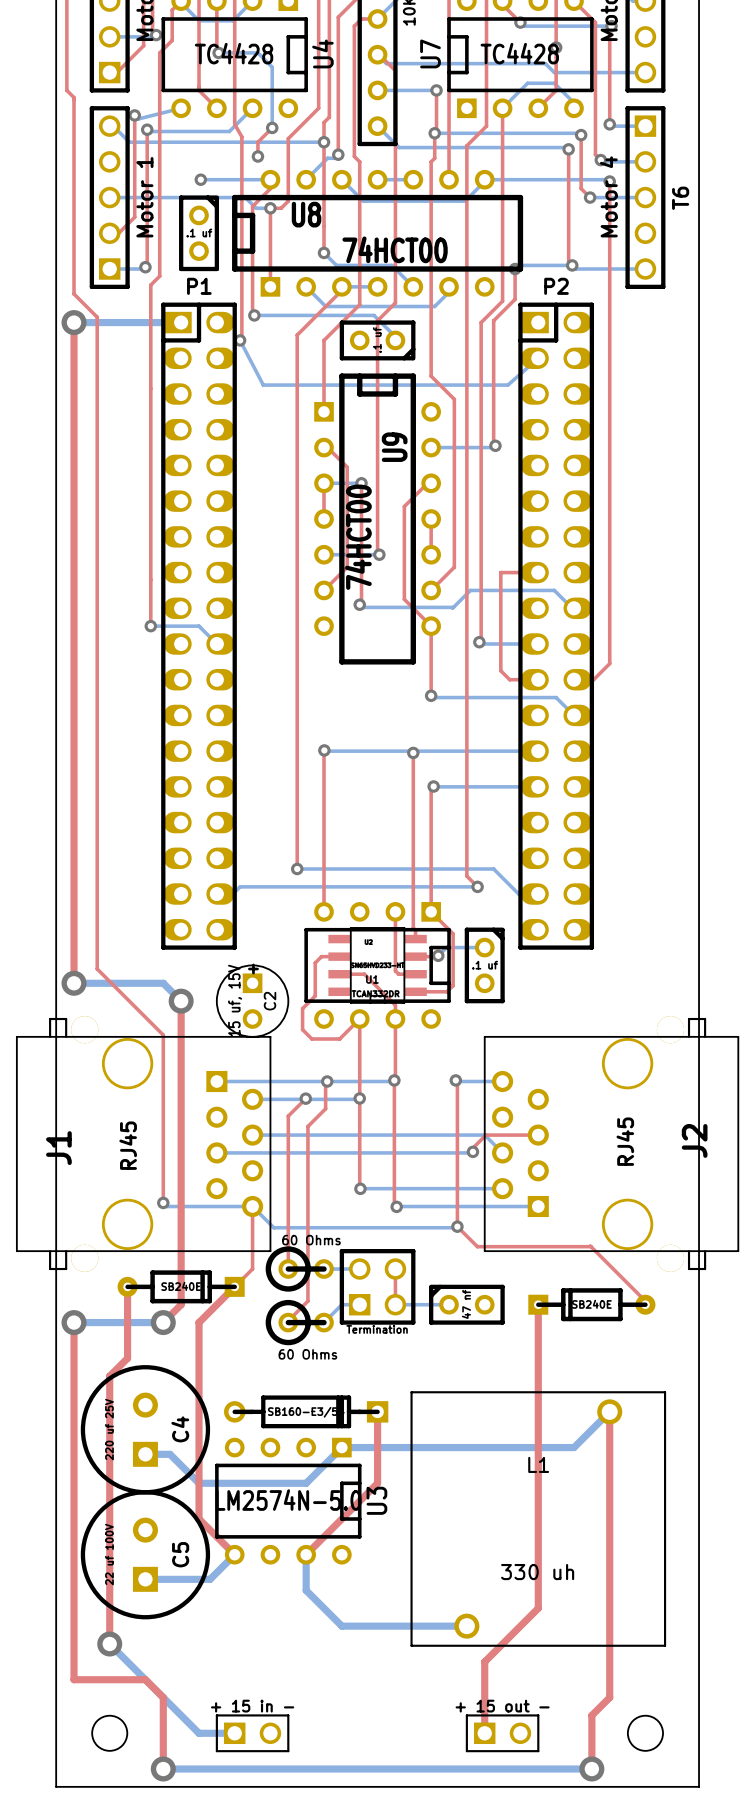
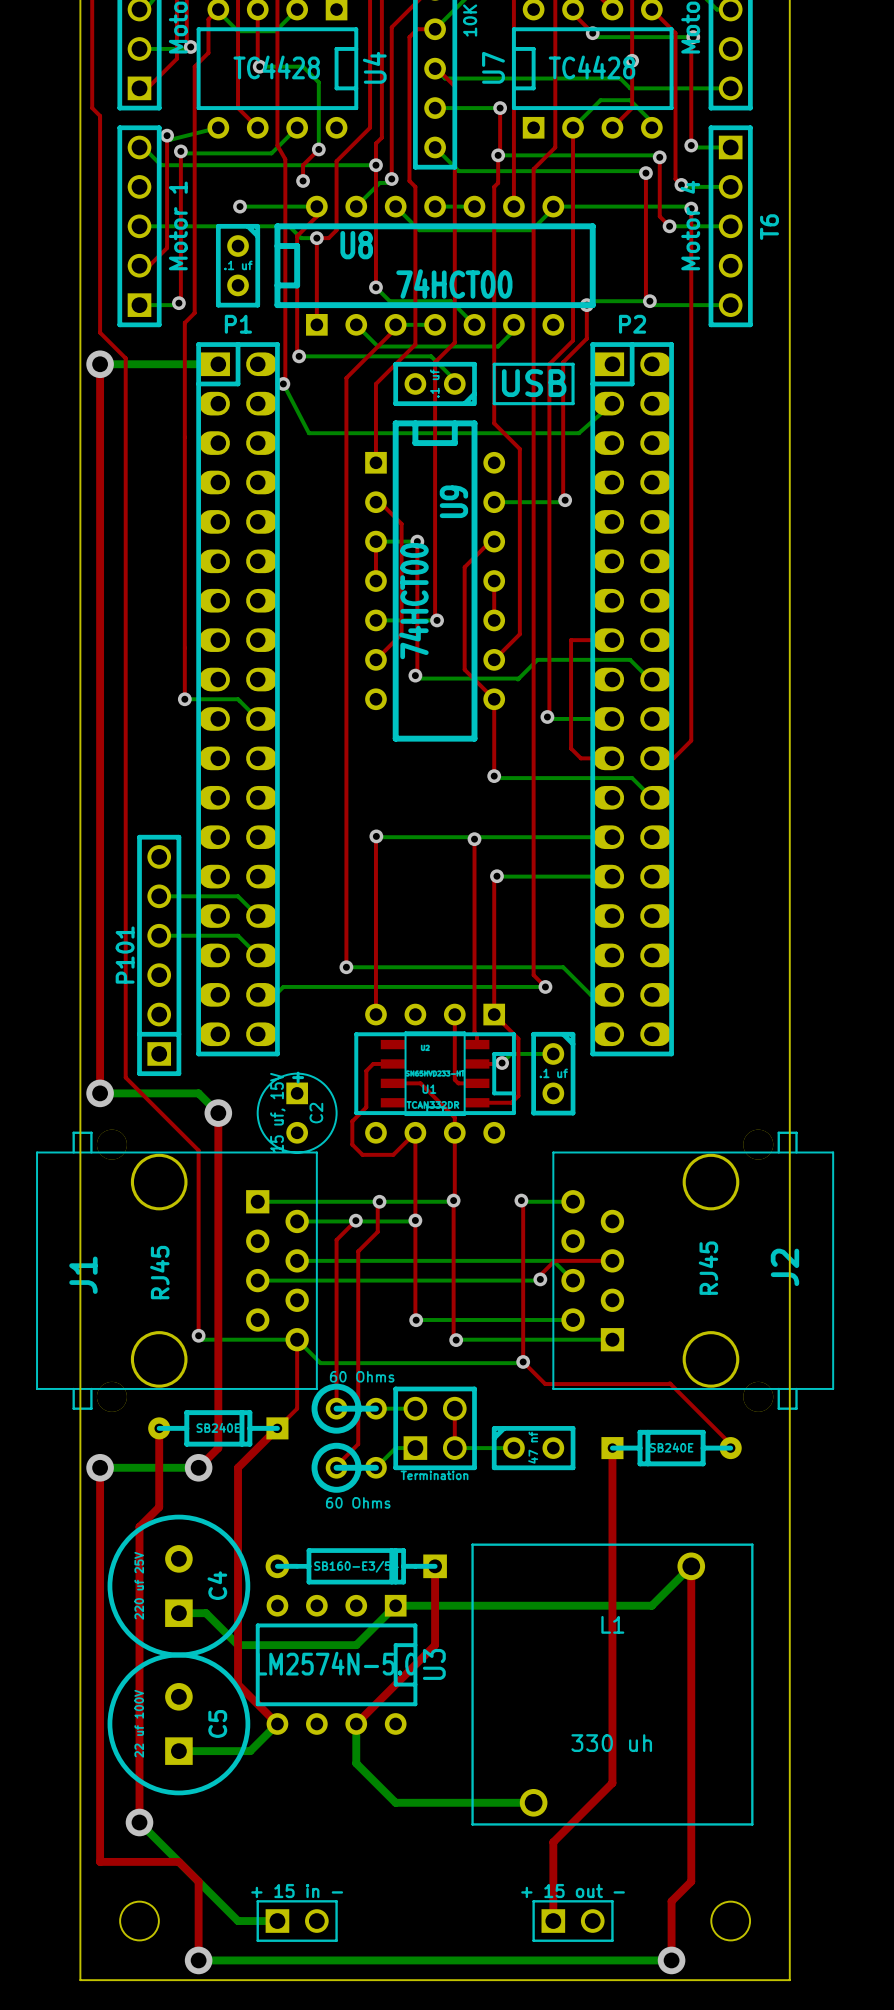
line: none -> (494, 364) (494, 403) (573, 403) (573, 364) (494, 364)
text: none -> USB (534, 383)
bottom track: none -> (159, 896) (238, 896) (257, 916)
bottom track: none -> (159, 935) (238, 935) (257, 955)
P101: none -> (159, 955)

